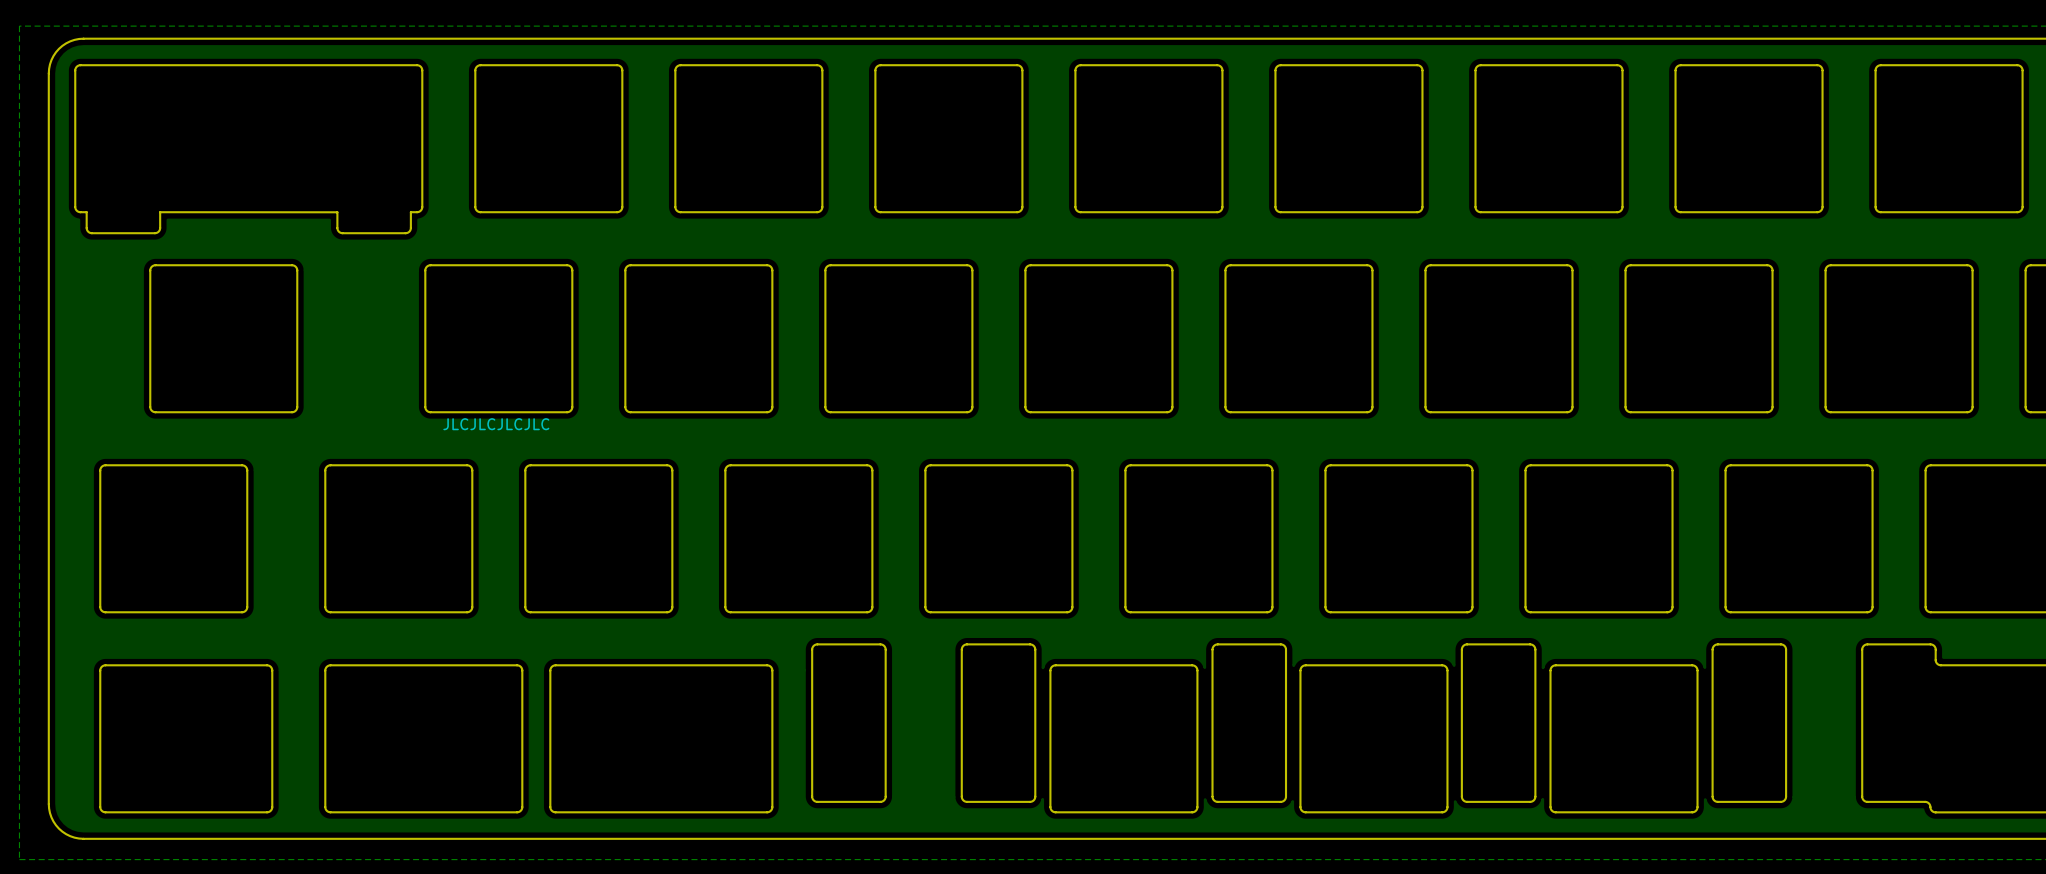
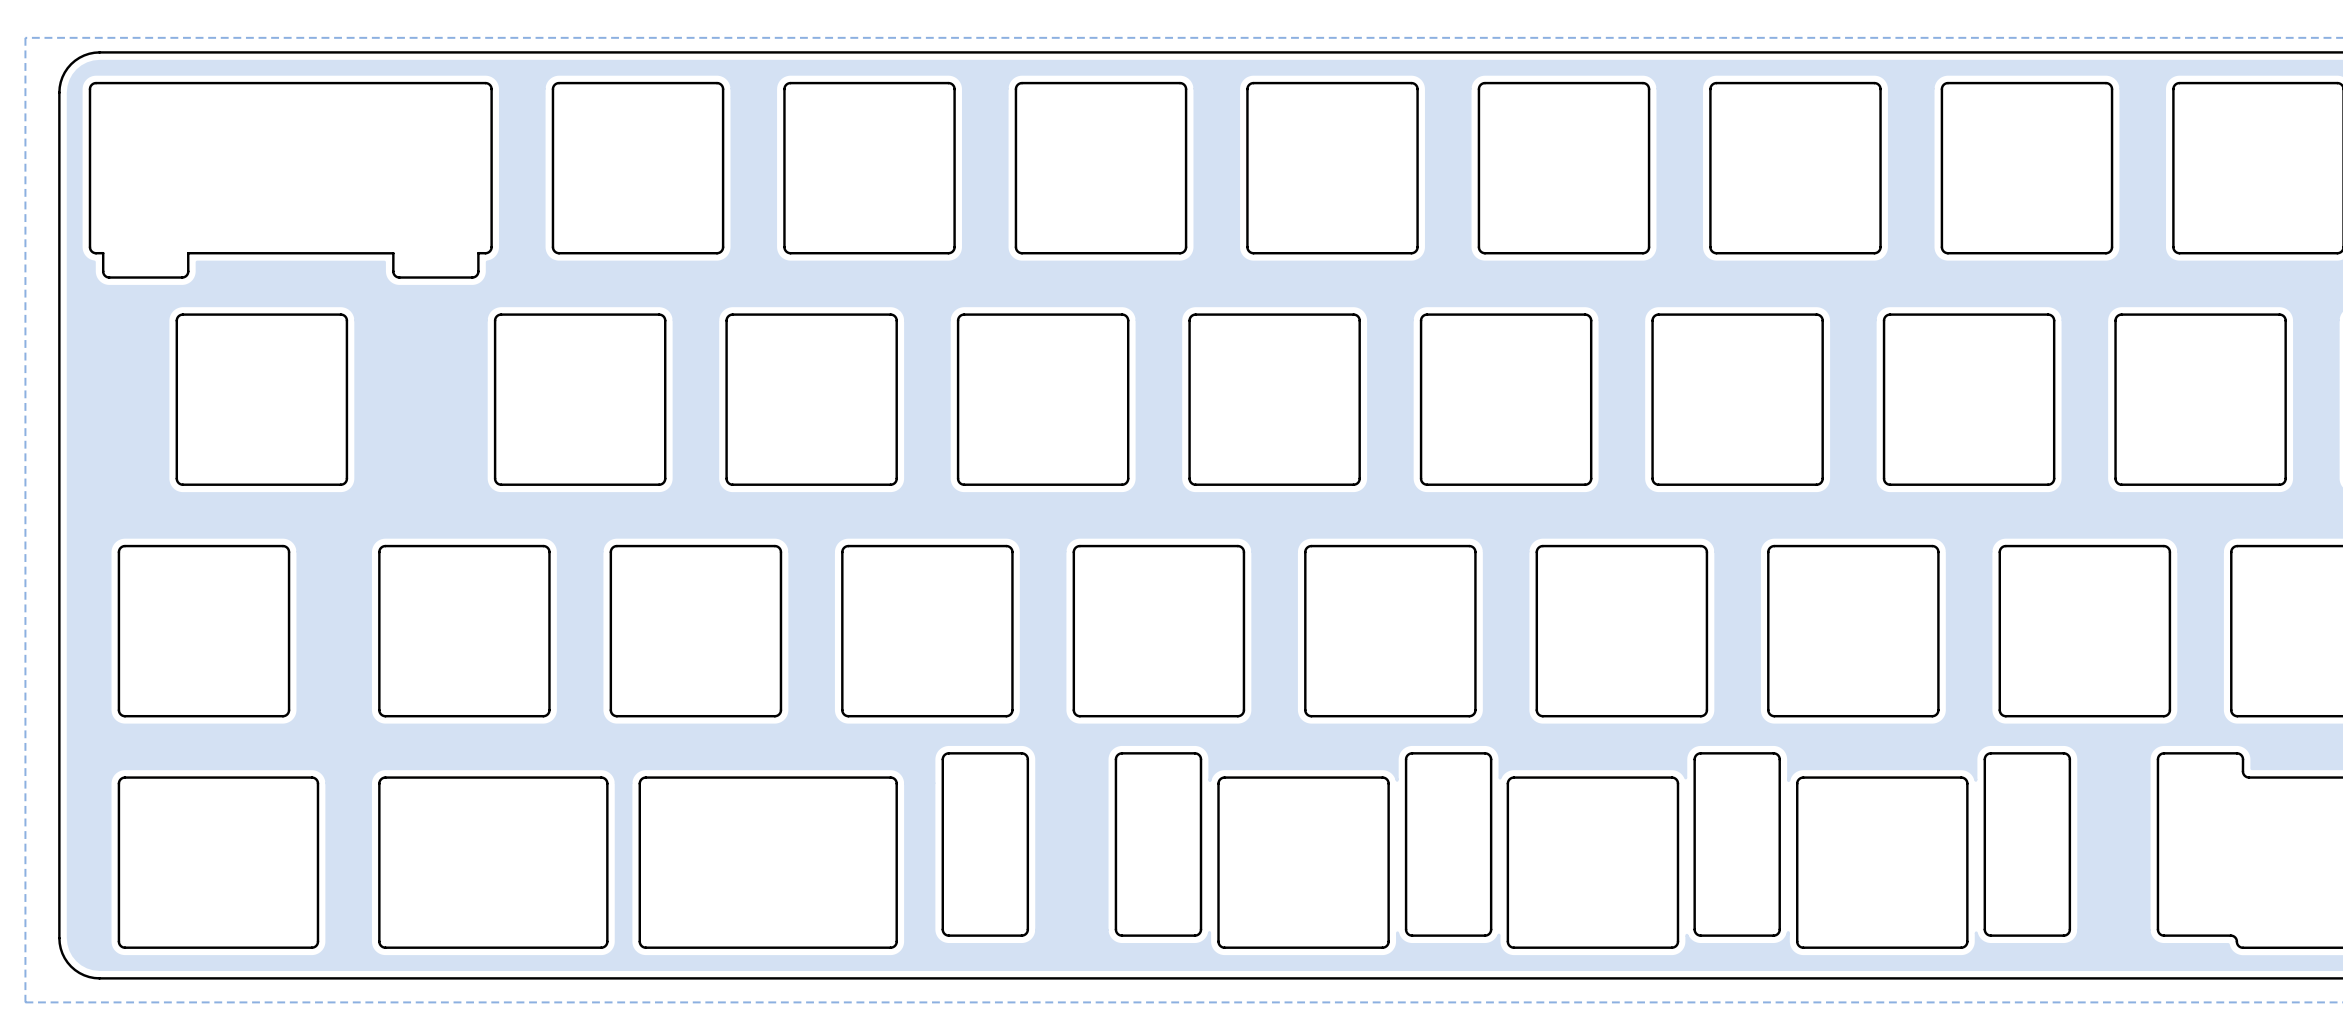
text: JLCJLCJLCJLC (496, 424) -> none

